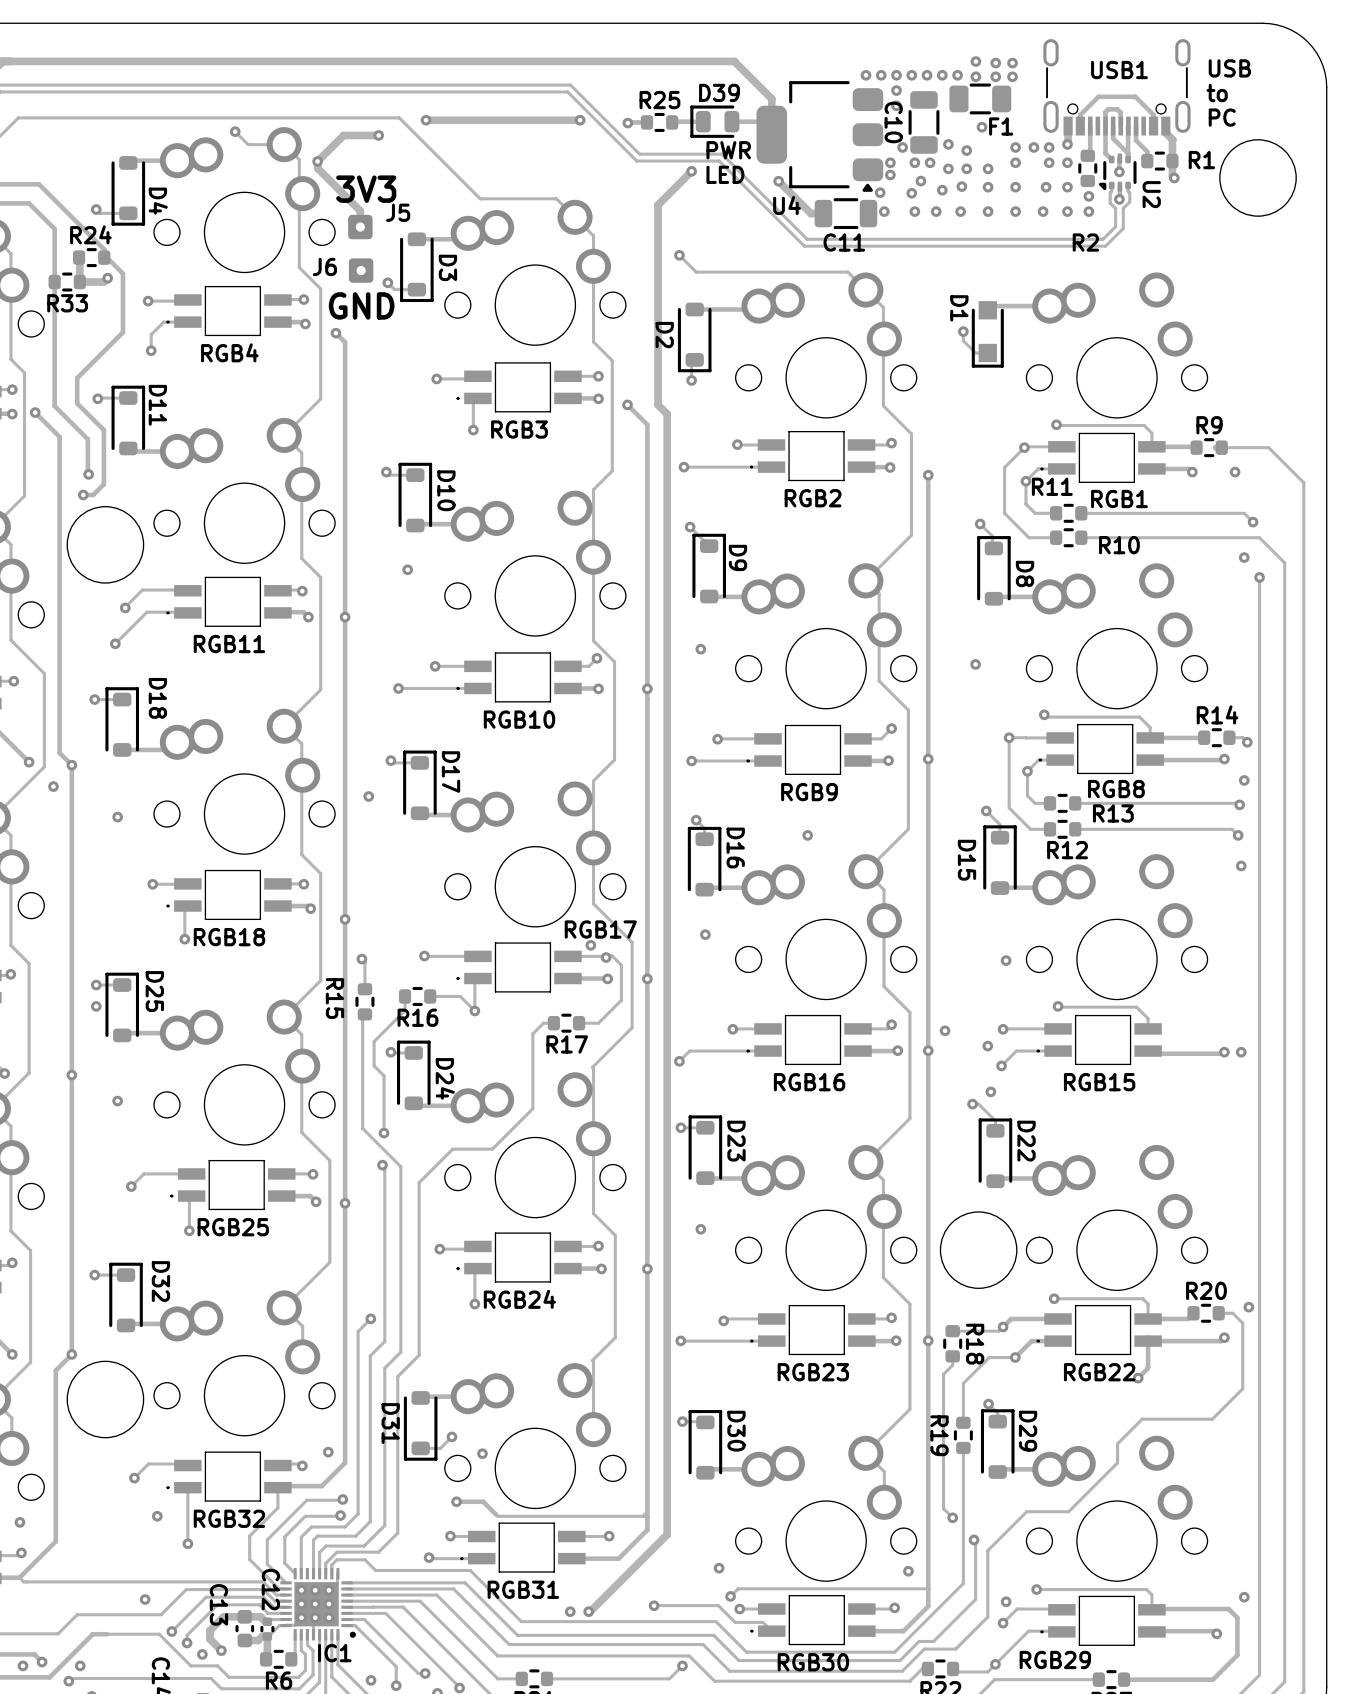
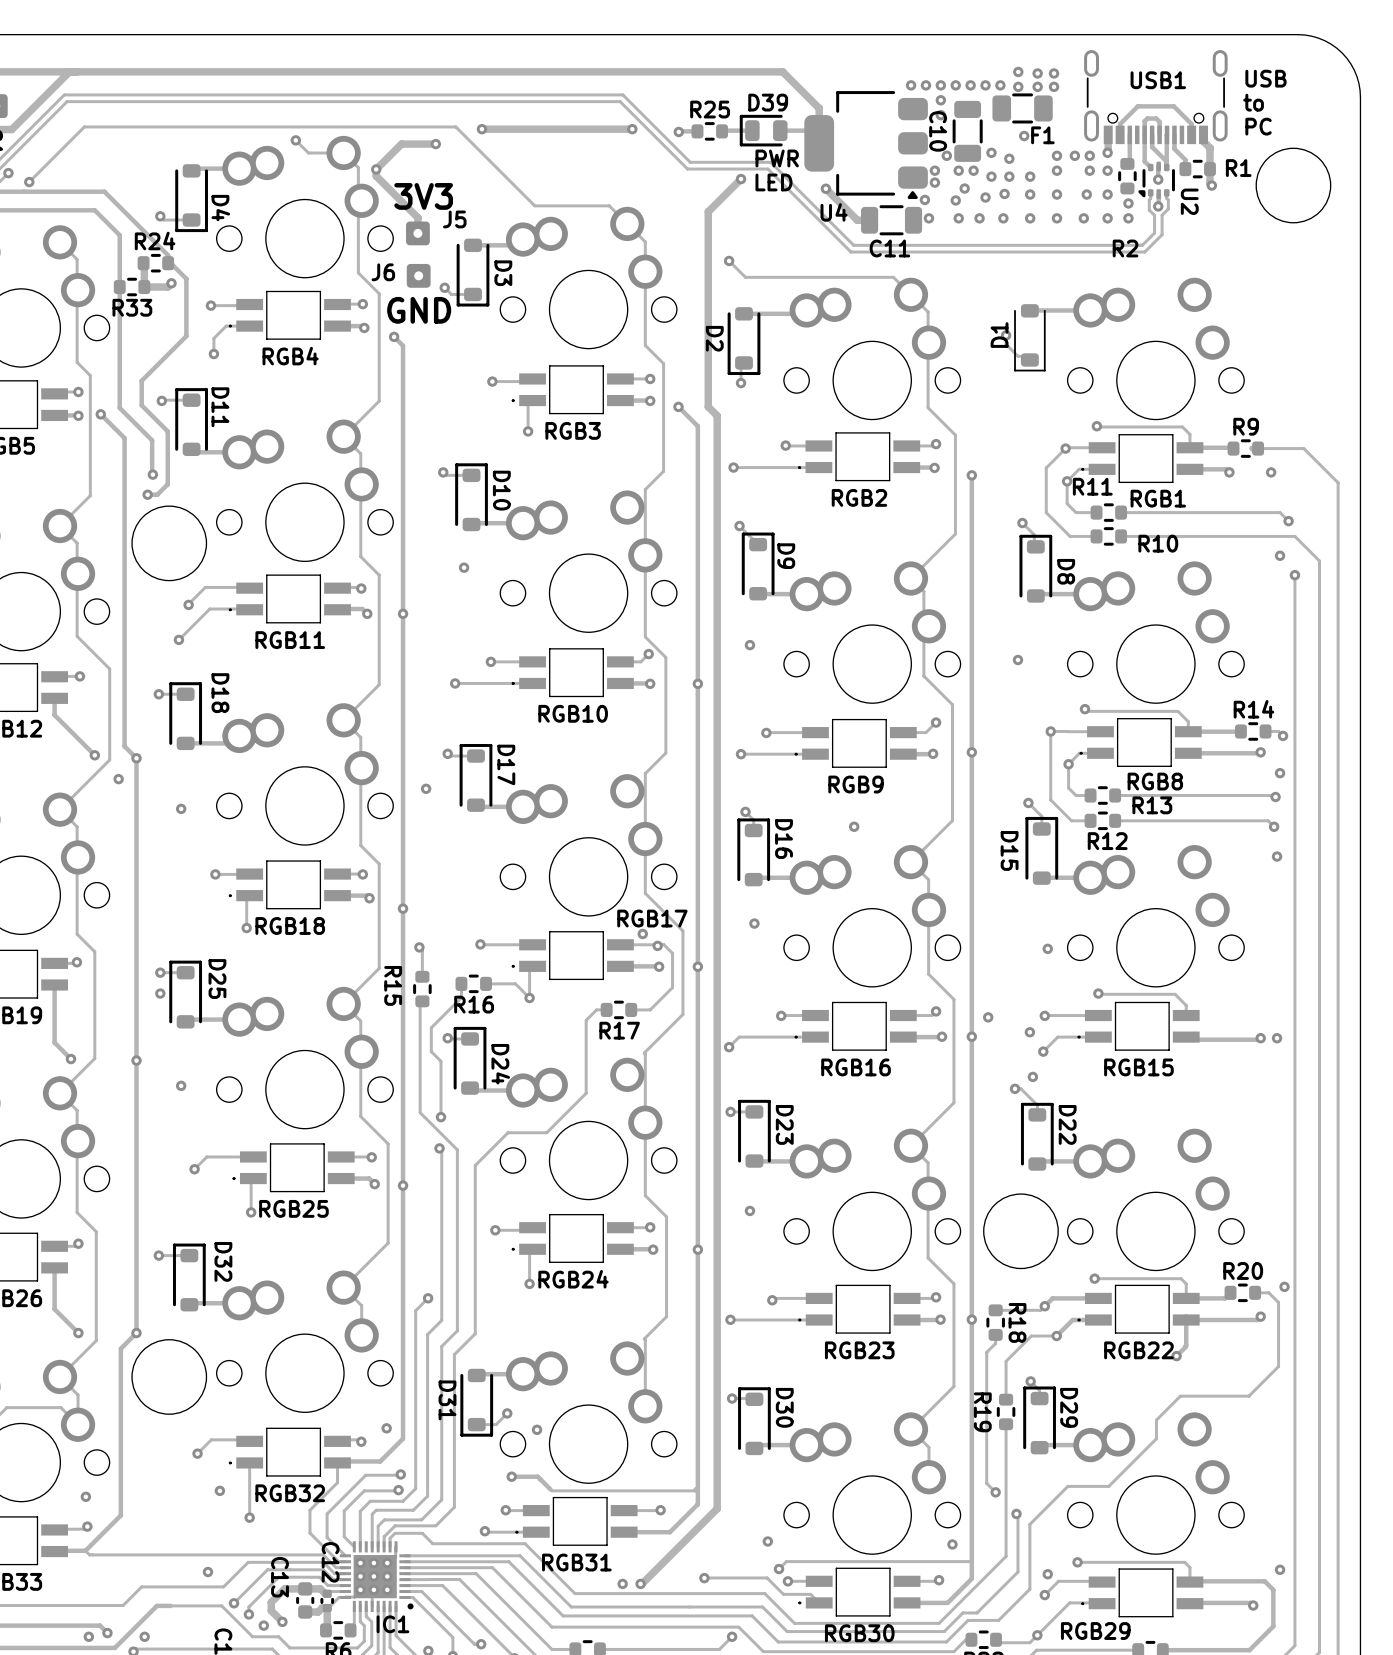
D1 footprint: [971, 301, 1004, 368] -> [1014, 304, 1046, 372]
D1 name rotation: 0° (959, 308) -> 180° (999, 335)

